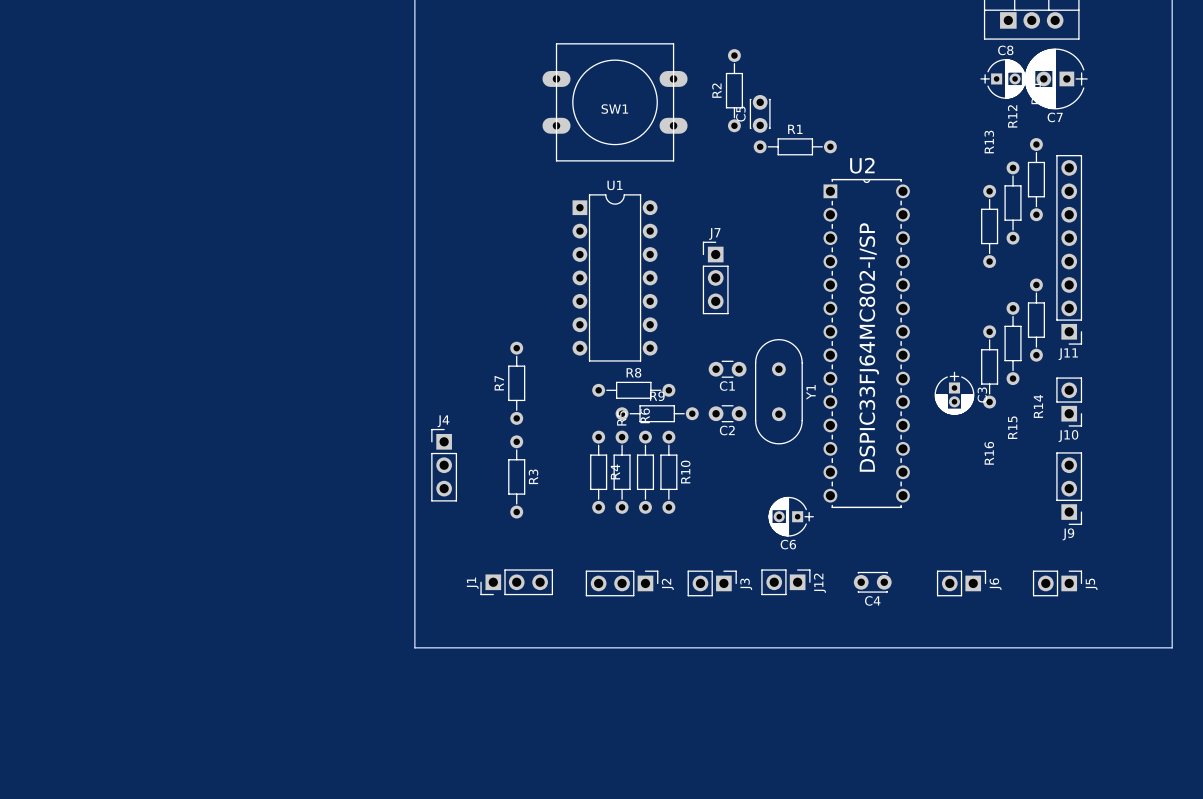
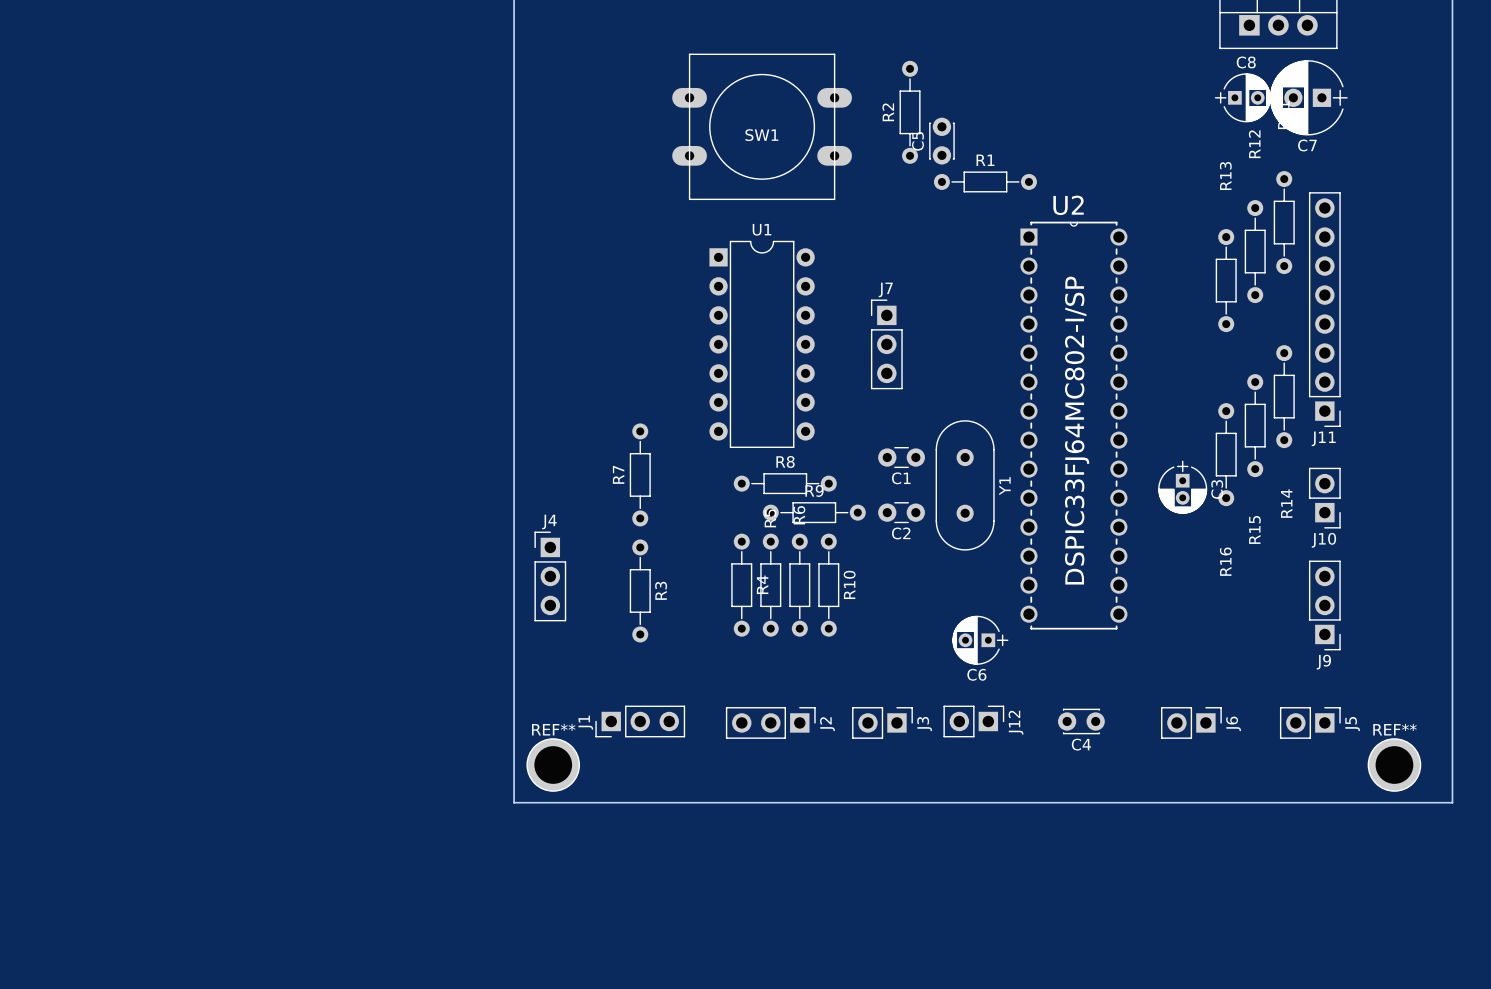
REF**: none -> (553, 765)
REF**: none -> (1394, 765)

